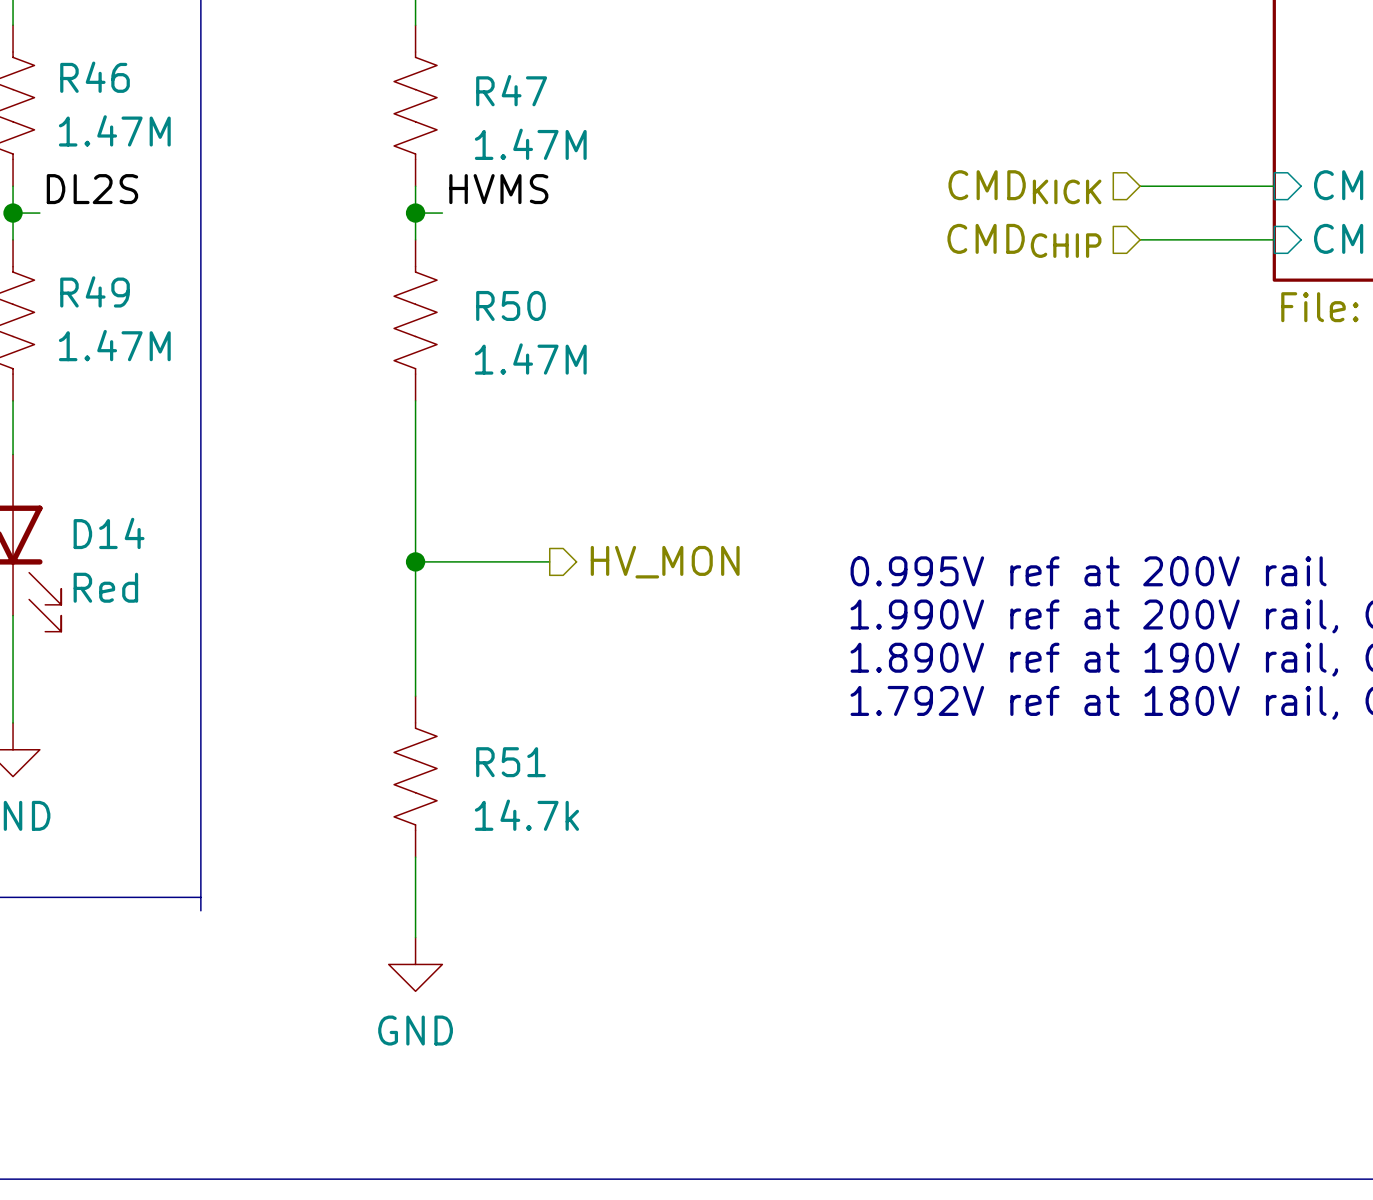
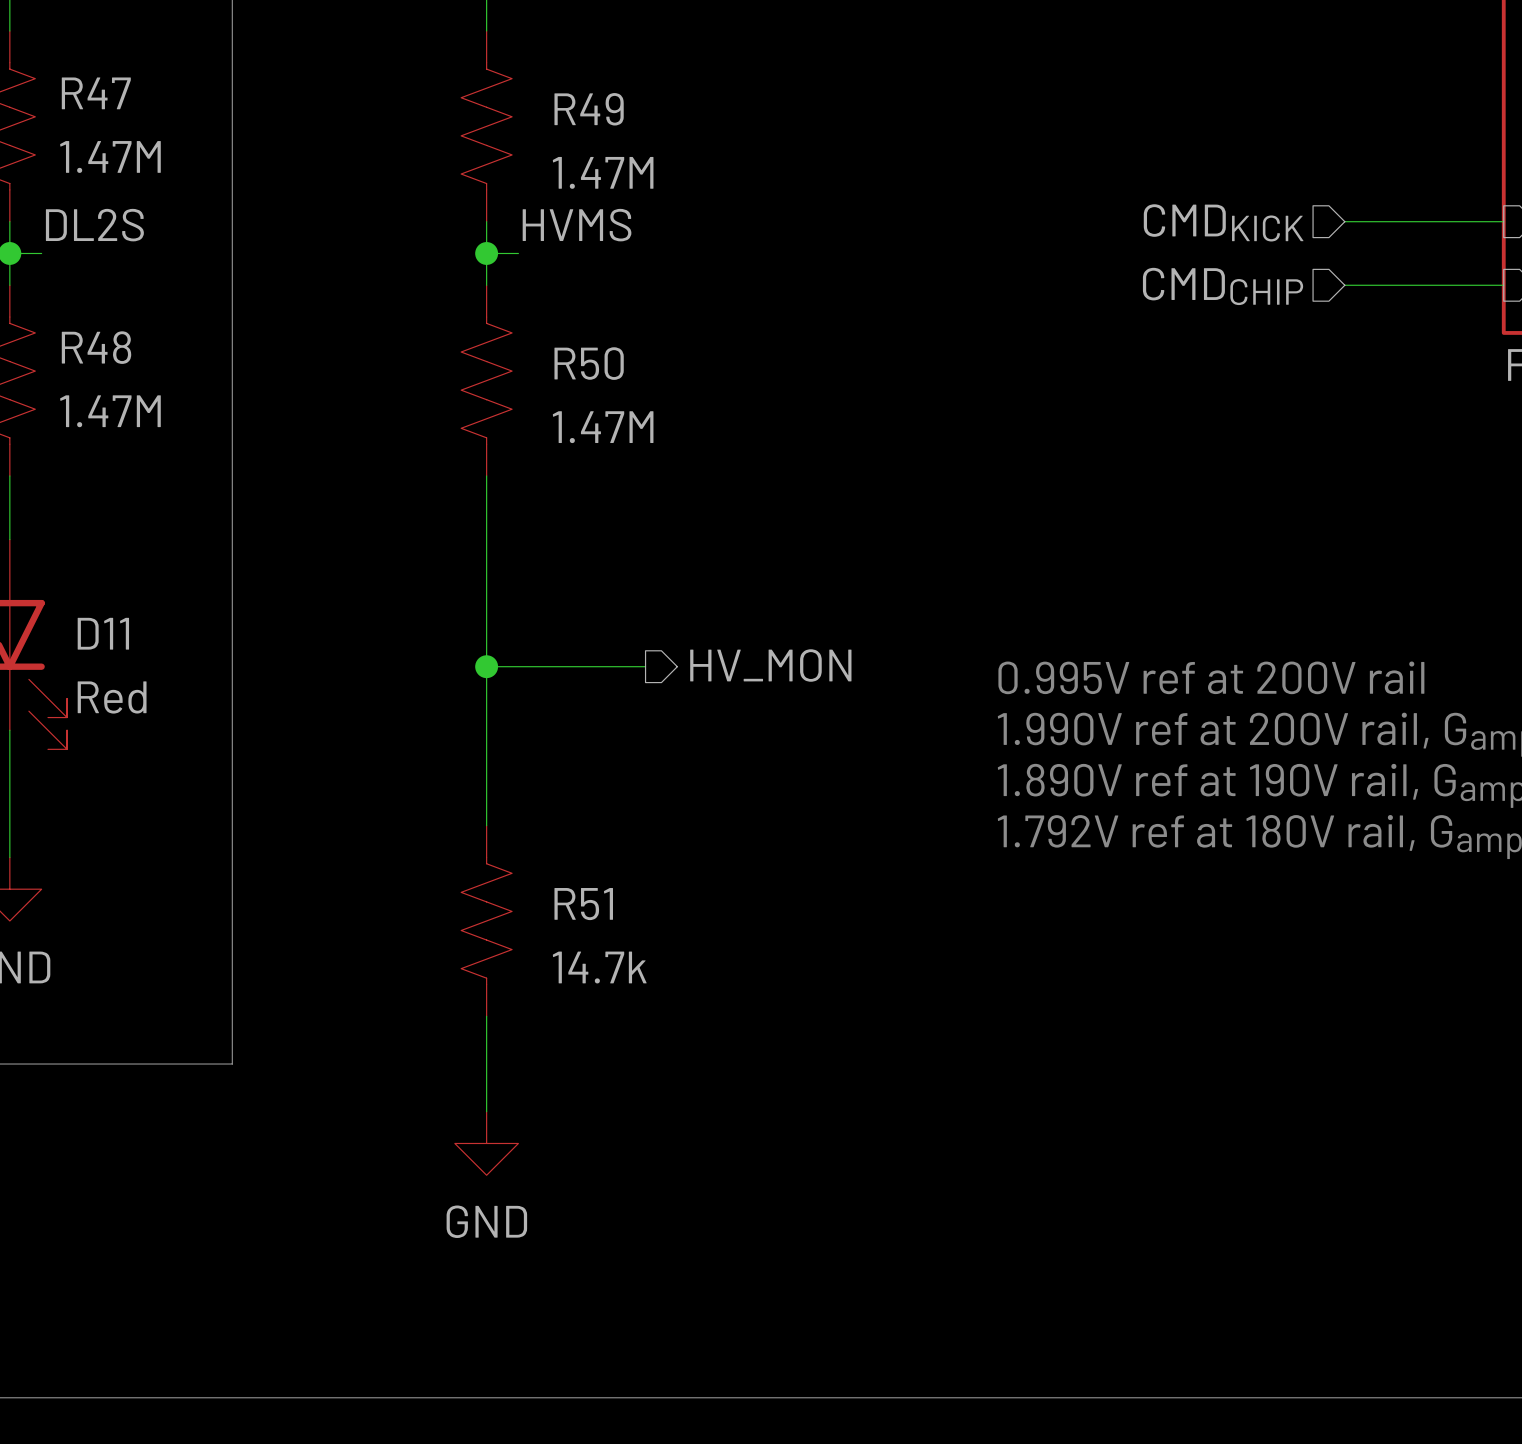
R46 name: R46 (95, 77) -> R47 (96, 93)
R47 name: R47 (511, 90) -> R49 (589, 109)
R49 name: R49 (95, 291) -> R48 (96, 347)
D14 name: D14 (109, 533) -> D11 (103, 633)
line: (200, 897) (200, 910) -> none

